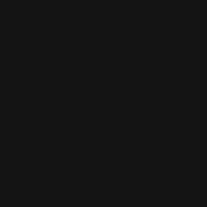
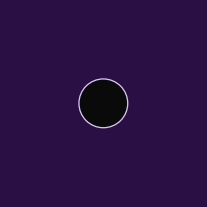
part: none -> (103, 103)

